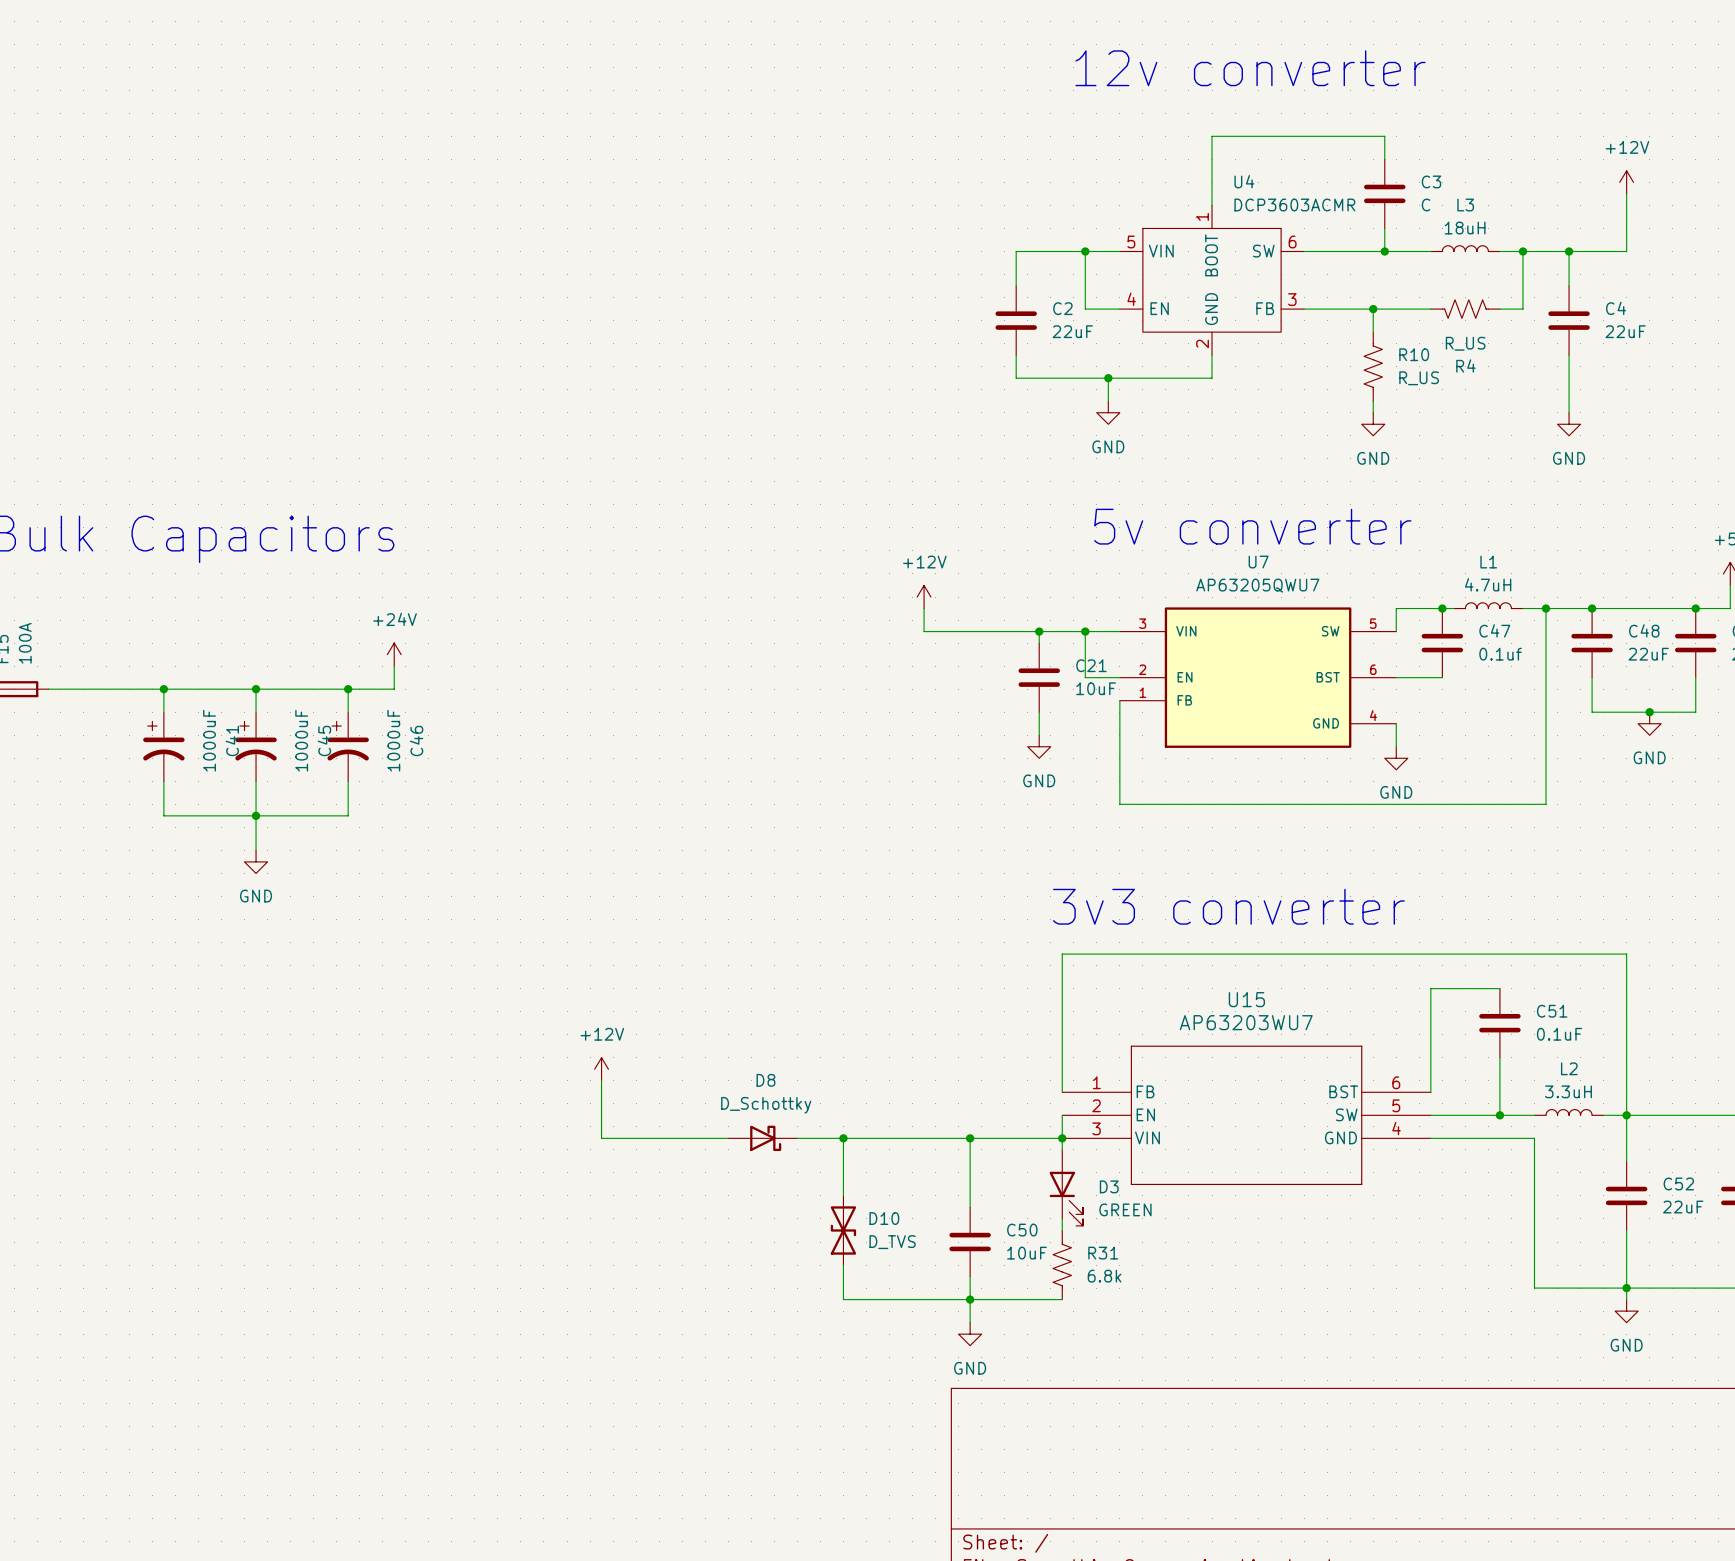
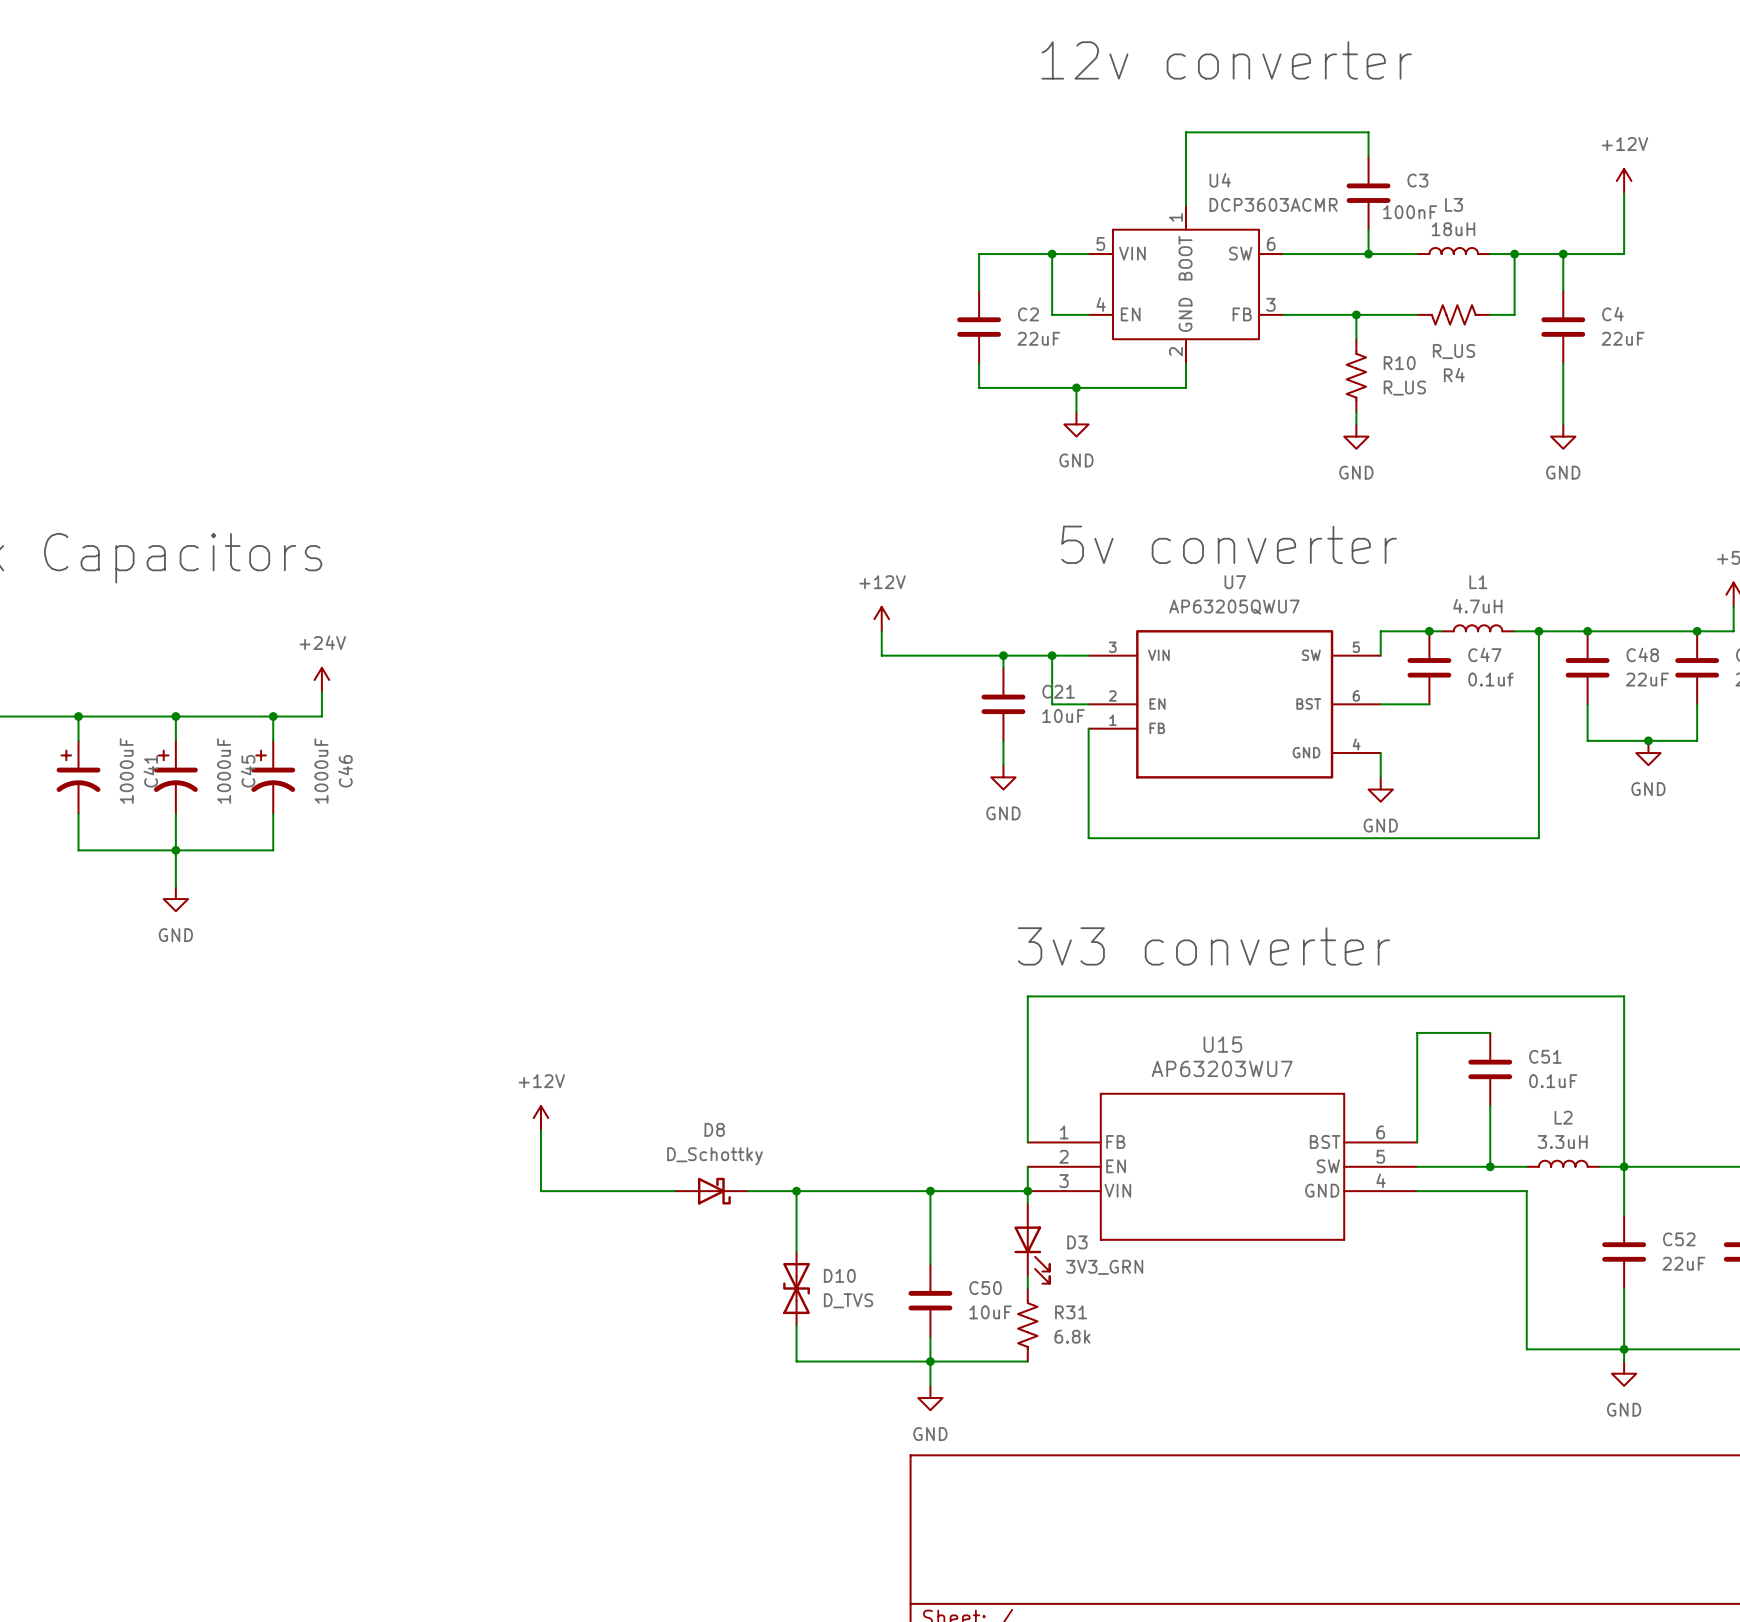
C3 value: C (1425, 204) -> 100nF (1410, 212)
D3 value: GREEN (1125, 1209) -> 3V3_GRN (1104, 1267)

